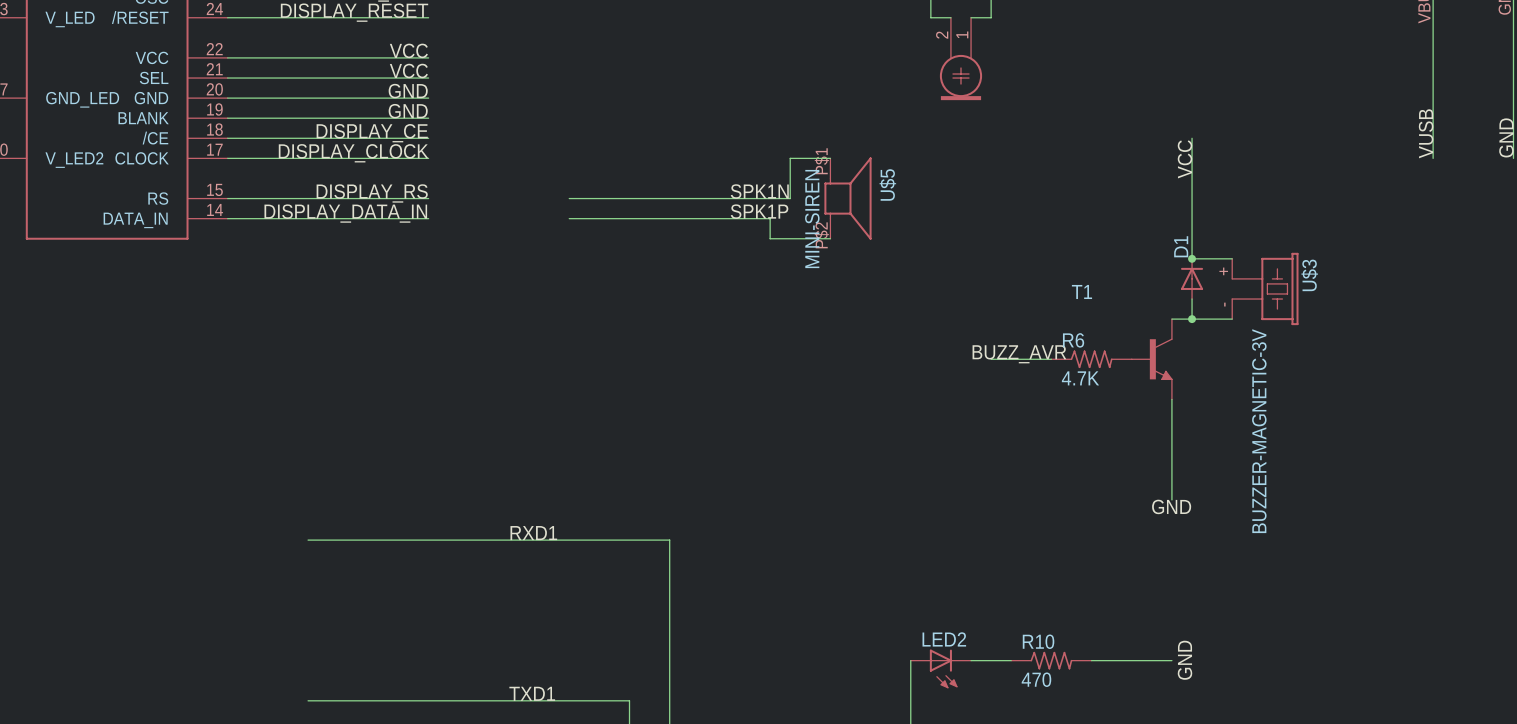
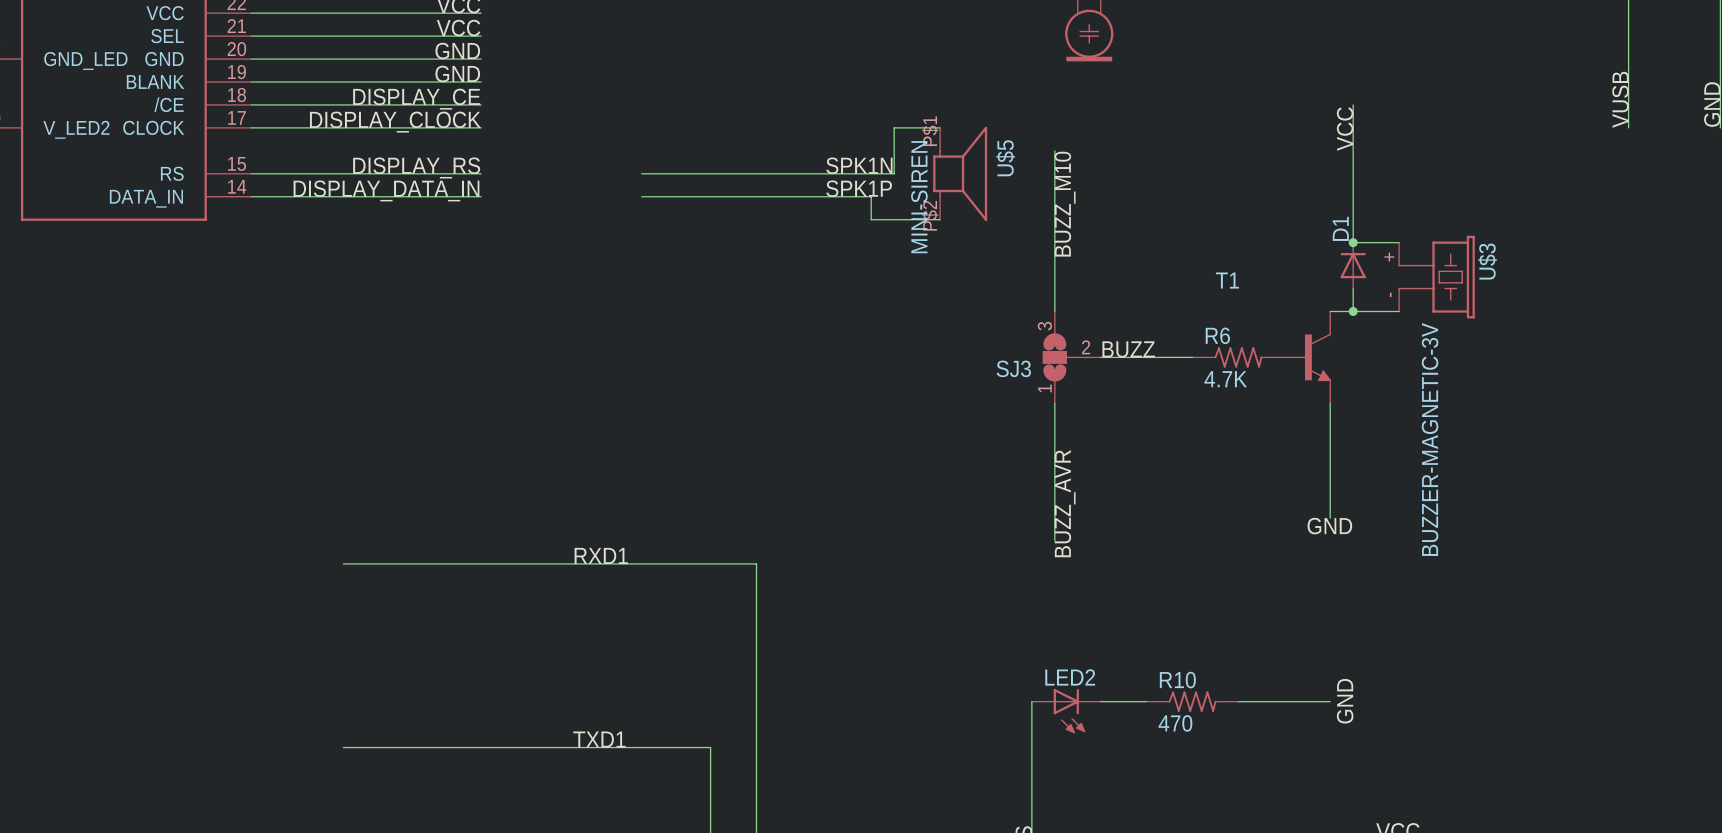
wire: none -> (1054, 150) (1054, 311)
label: none -> BUZZ_M10 (1065, 204)
label: BUZZ_AVR (1019, 354) -> BUZZ (1128, 349)
SJ3: none -> (1071, 357)
wire: none -> (1100, 357) (1123, 357)
wire: none -> (1054, 403) (1054, 541)
label: none -> BUZZ_AVR (1065, 503)

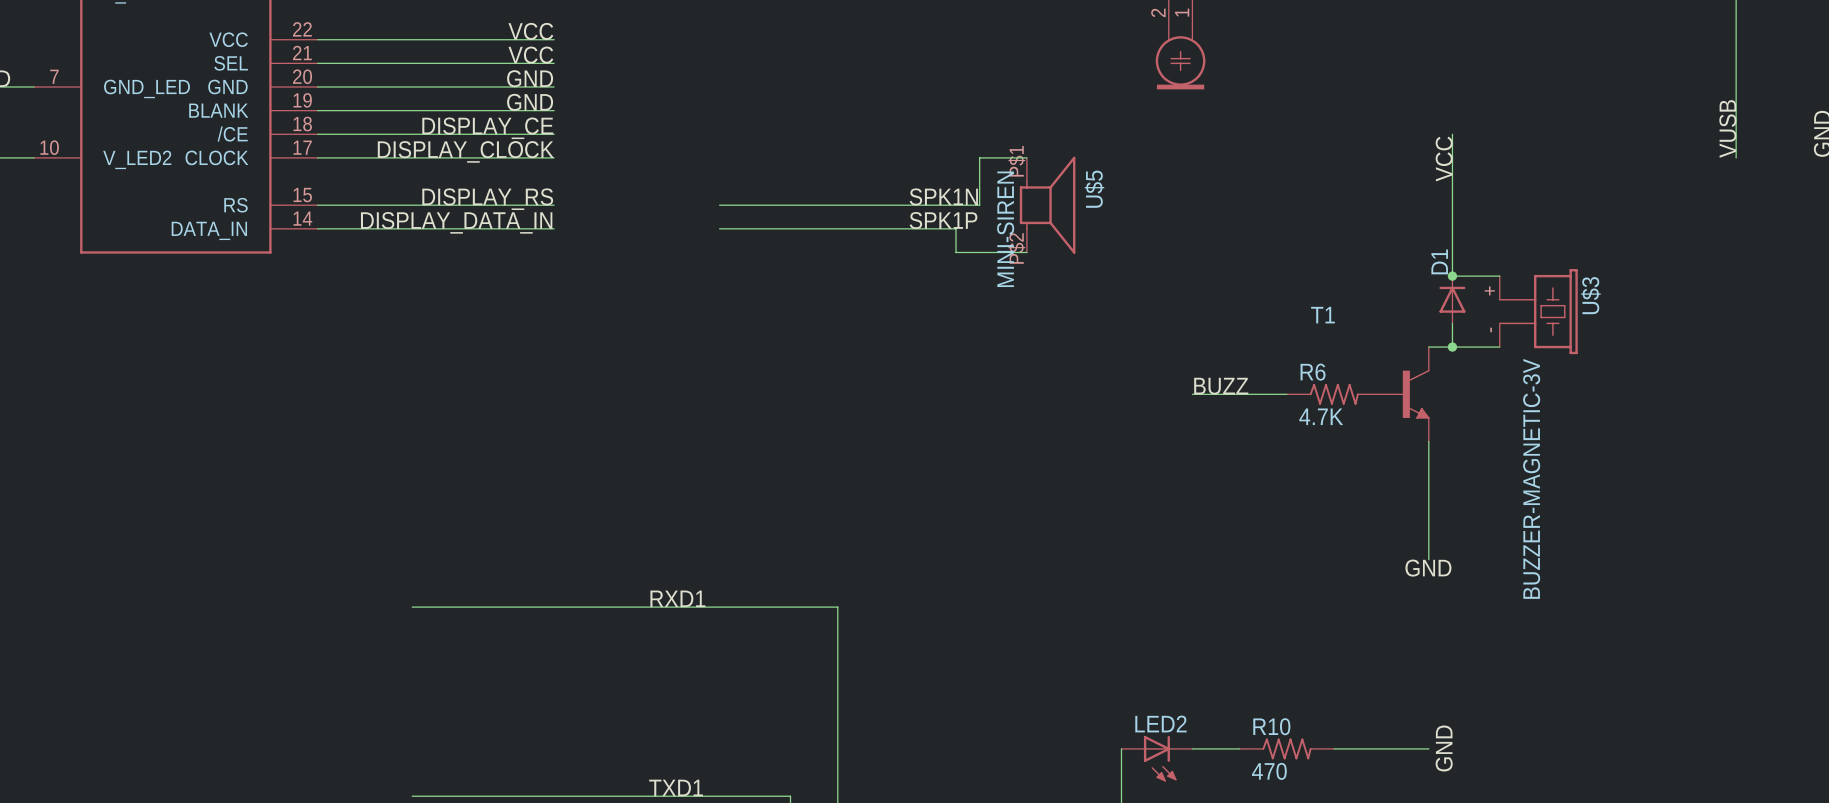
wire: (1054, 150) (1054, 311) -> none
label: BUZZ_M10 (1065, 204) -> none
SJ3: (1071, 357) -> none
wire: (1054, 403) (1054, 541) -> none
label: BUZZ_AVR (1065, 503) -> none

